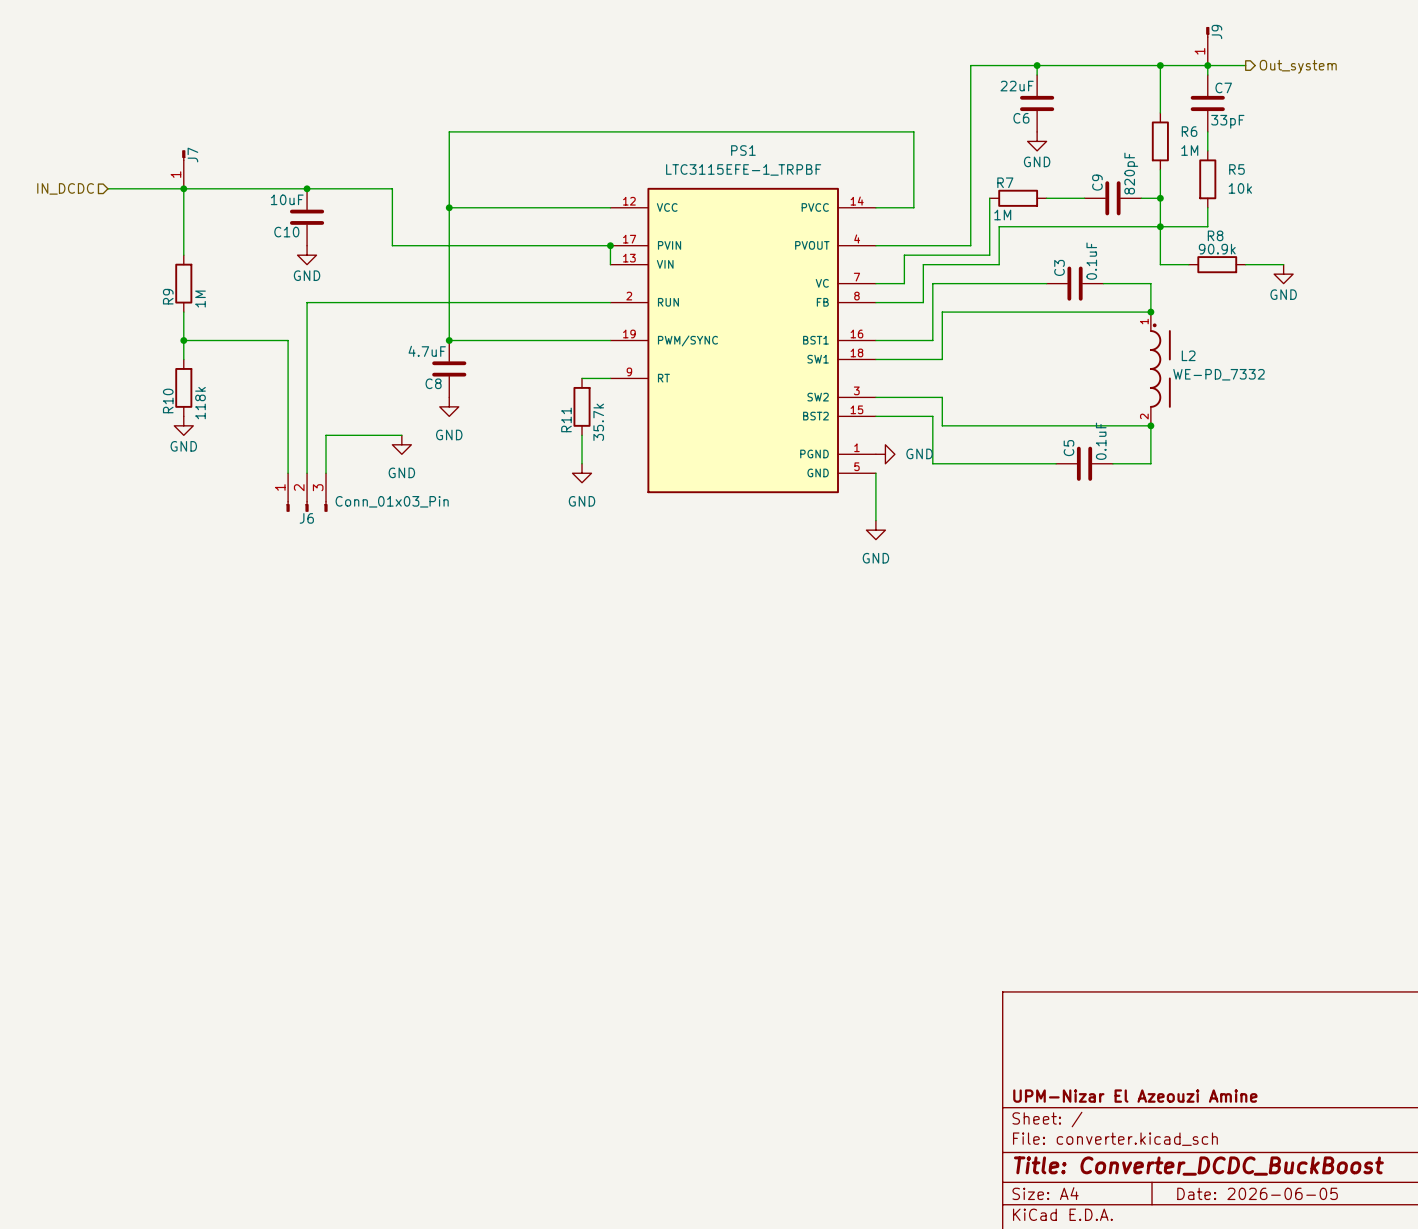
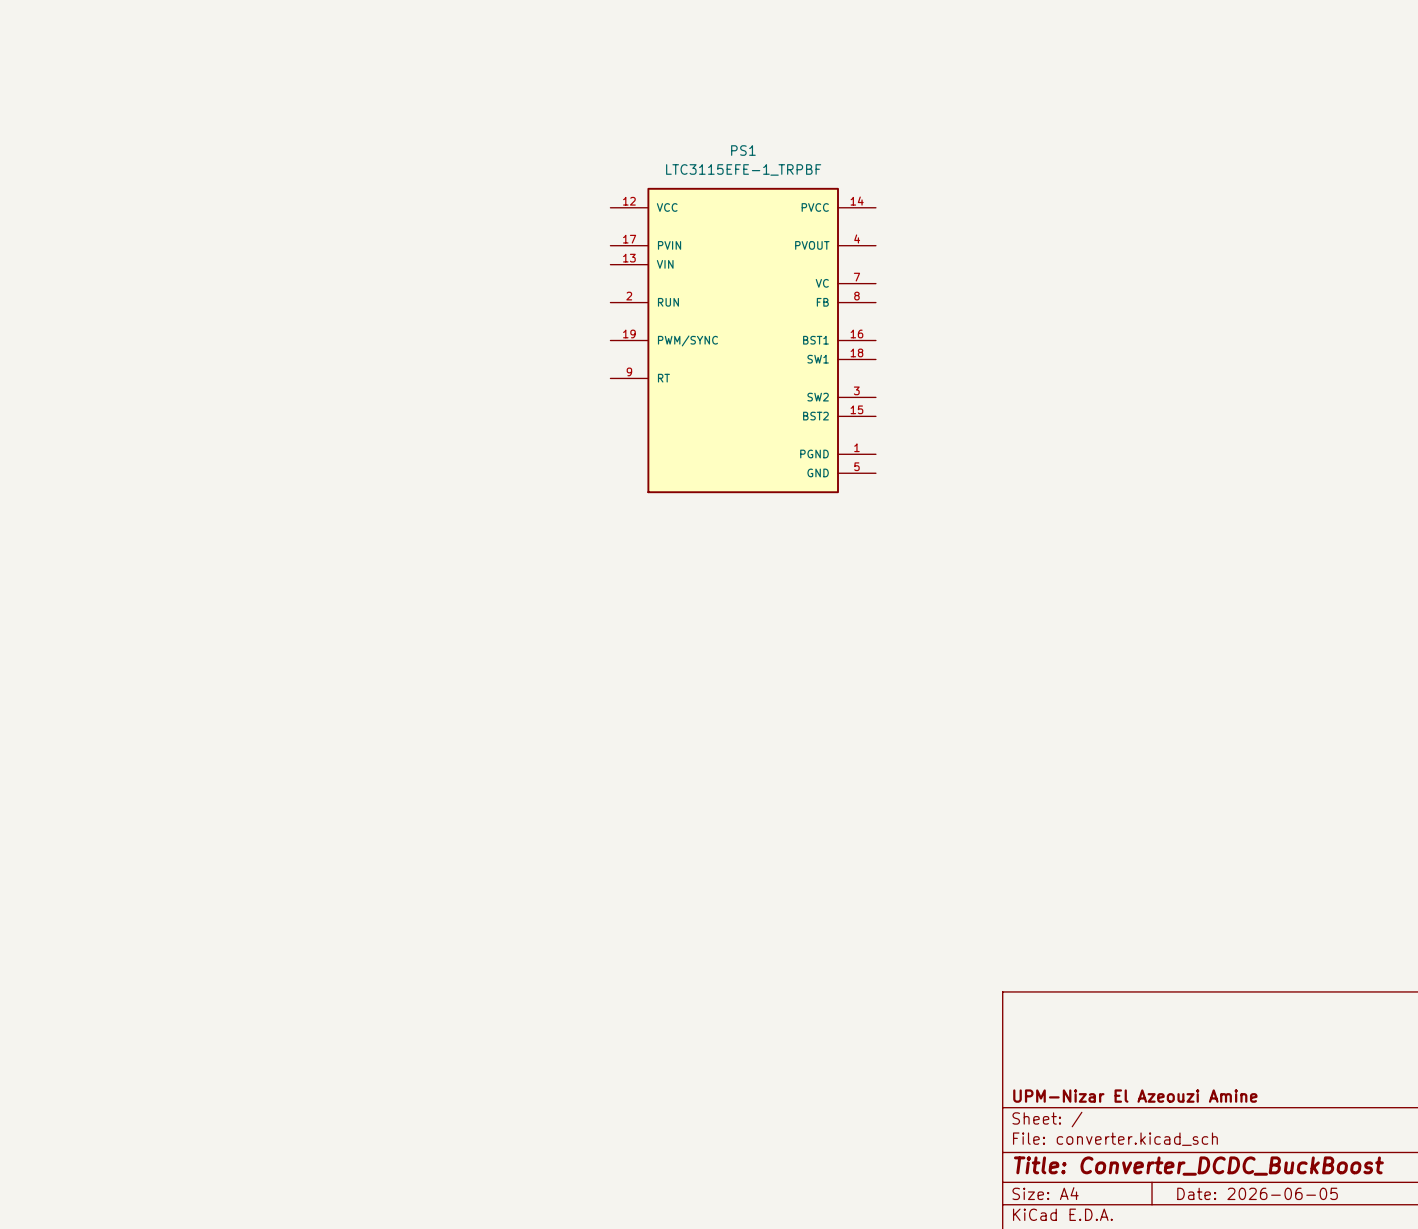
J9: (1207, 46) -> none
wire: (1037, 65) (1037, 75) -> none
junction: (1037, 65) -> none
wire: (1160, 65) (1160, 112) -> none
junction: (1160, 65) -> none
wire: (1207, 65) (1207, 75) -> none
junction: (1207, 65) -> none
wire: (1245, 65) (970, 65) (970, 245) (875, 245) -> none
hierarchical label: Out_system (1298, 66) -> none
C6: 22uF (1037, 103) -> none
C7: 33pF (1207, 103) -> none
wire: (1207, 131) (1207, 150) -> none
power symbol: GND (1037, 141) -> none
R6: 1M (1160, 141) -> none
J7: (183, 169) -> none
wire: (1160, 169) (1160, 264) (1188, 264) -> none
R5: 10k (1207, 179) -> none
hierarchical label: IN_DCDC (65, 188) -> none
wire: (107, 188) (392, 188) (392, 245) (610, 245) (610, 264) -> none
wire: (183, 188) (183, 255) -> none
junction: (183, 188) -> none
junction: (307, 188) -> none
wire: (989, 198) (989, 255) (904, 255) (904, 283) (875, 283) -> none
R7: 1M (1018, 198) -> none
wire: (1046, 198) (1084, 198) -> none
C9: 820pF (1112, 198) -> none
wire: (1141, 198) (1160, 198) -> none
junction: (1160, 198) -> none
wire: (449, 207) (610, 207) -> none
junction: (449, 207) -> none
wire: (875, 207) (913, 207) (913, 131) (449, 131) (449, 340) (610, 340) -> none
wire: (1207, 207) (1207, 226) (999, 226) (999, 264) (923, 264) (923, 302) (875, 302) -> none
C10: 10uF (307, 217) -> none
junction: (1160, 226) -> none
junction: (610, 245) -> none
power symbol: GND (307, 255) -> none
R8: 90.9k (1217, 264) -> none
wire: (1245, 264) (1283, 264) -> none
power symbol: GND (1283, 274) -> none
R9: 1M (183, 283) -> none
wire: (1046, 283) (932, 283) (932, 340) (875, 340) -> none
C3: 0.1uF (1075, 283) -> none
wire: (1103, 283) (1150, 283) (1150, 312) (942, 312) (942, 359) (875, 359) -> none
wire: (610, 302) (307, 302) (307, 473) -> none
wire: (183, 312) (183, 359) -> none
junction: (1150, 312) -> none
wire: (183, 340) (288, 340) (288, 473) -> none
junction: (183, 340) -> none
junction: (449, 340) -> none
C8: 4.7uF (449, 368) -> none
L2: WE-PD_7332 (1160, 368) -> none
wire: (582, 378) (610, 378) -> none
R10: 118k (183, 387) -> none
wire: (875, 397) (942, 397) (942, 425) (1150, 425) (1150, 463) (1112, 463) -> none
power symbol: GND (449, 406) -> none
R11: 35.7k (582, 406) -> none
wire: (875, 416) (932, 416) (932, 463) (1056, 463) -> none
power symbol: GND (183, 425) -> none
junction: (1150, 425) -> none
wire: (401, 435) (326, 435) (326, 473) -> none
wire: (582, 435) (582, 463) -> none
power symbol: GND (401, 444) -> none
power symbol: GND (885, 454) -> none
C5: 0.1uF (1084, 463) -> none
power symbol: GND (582, 473) -> none
wire: (875, 473) (875, 520) -> none
J6: Conn_01x03_Pin (307, 492) -> none
power symbol: GND (875, 530) -> none

